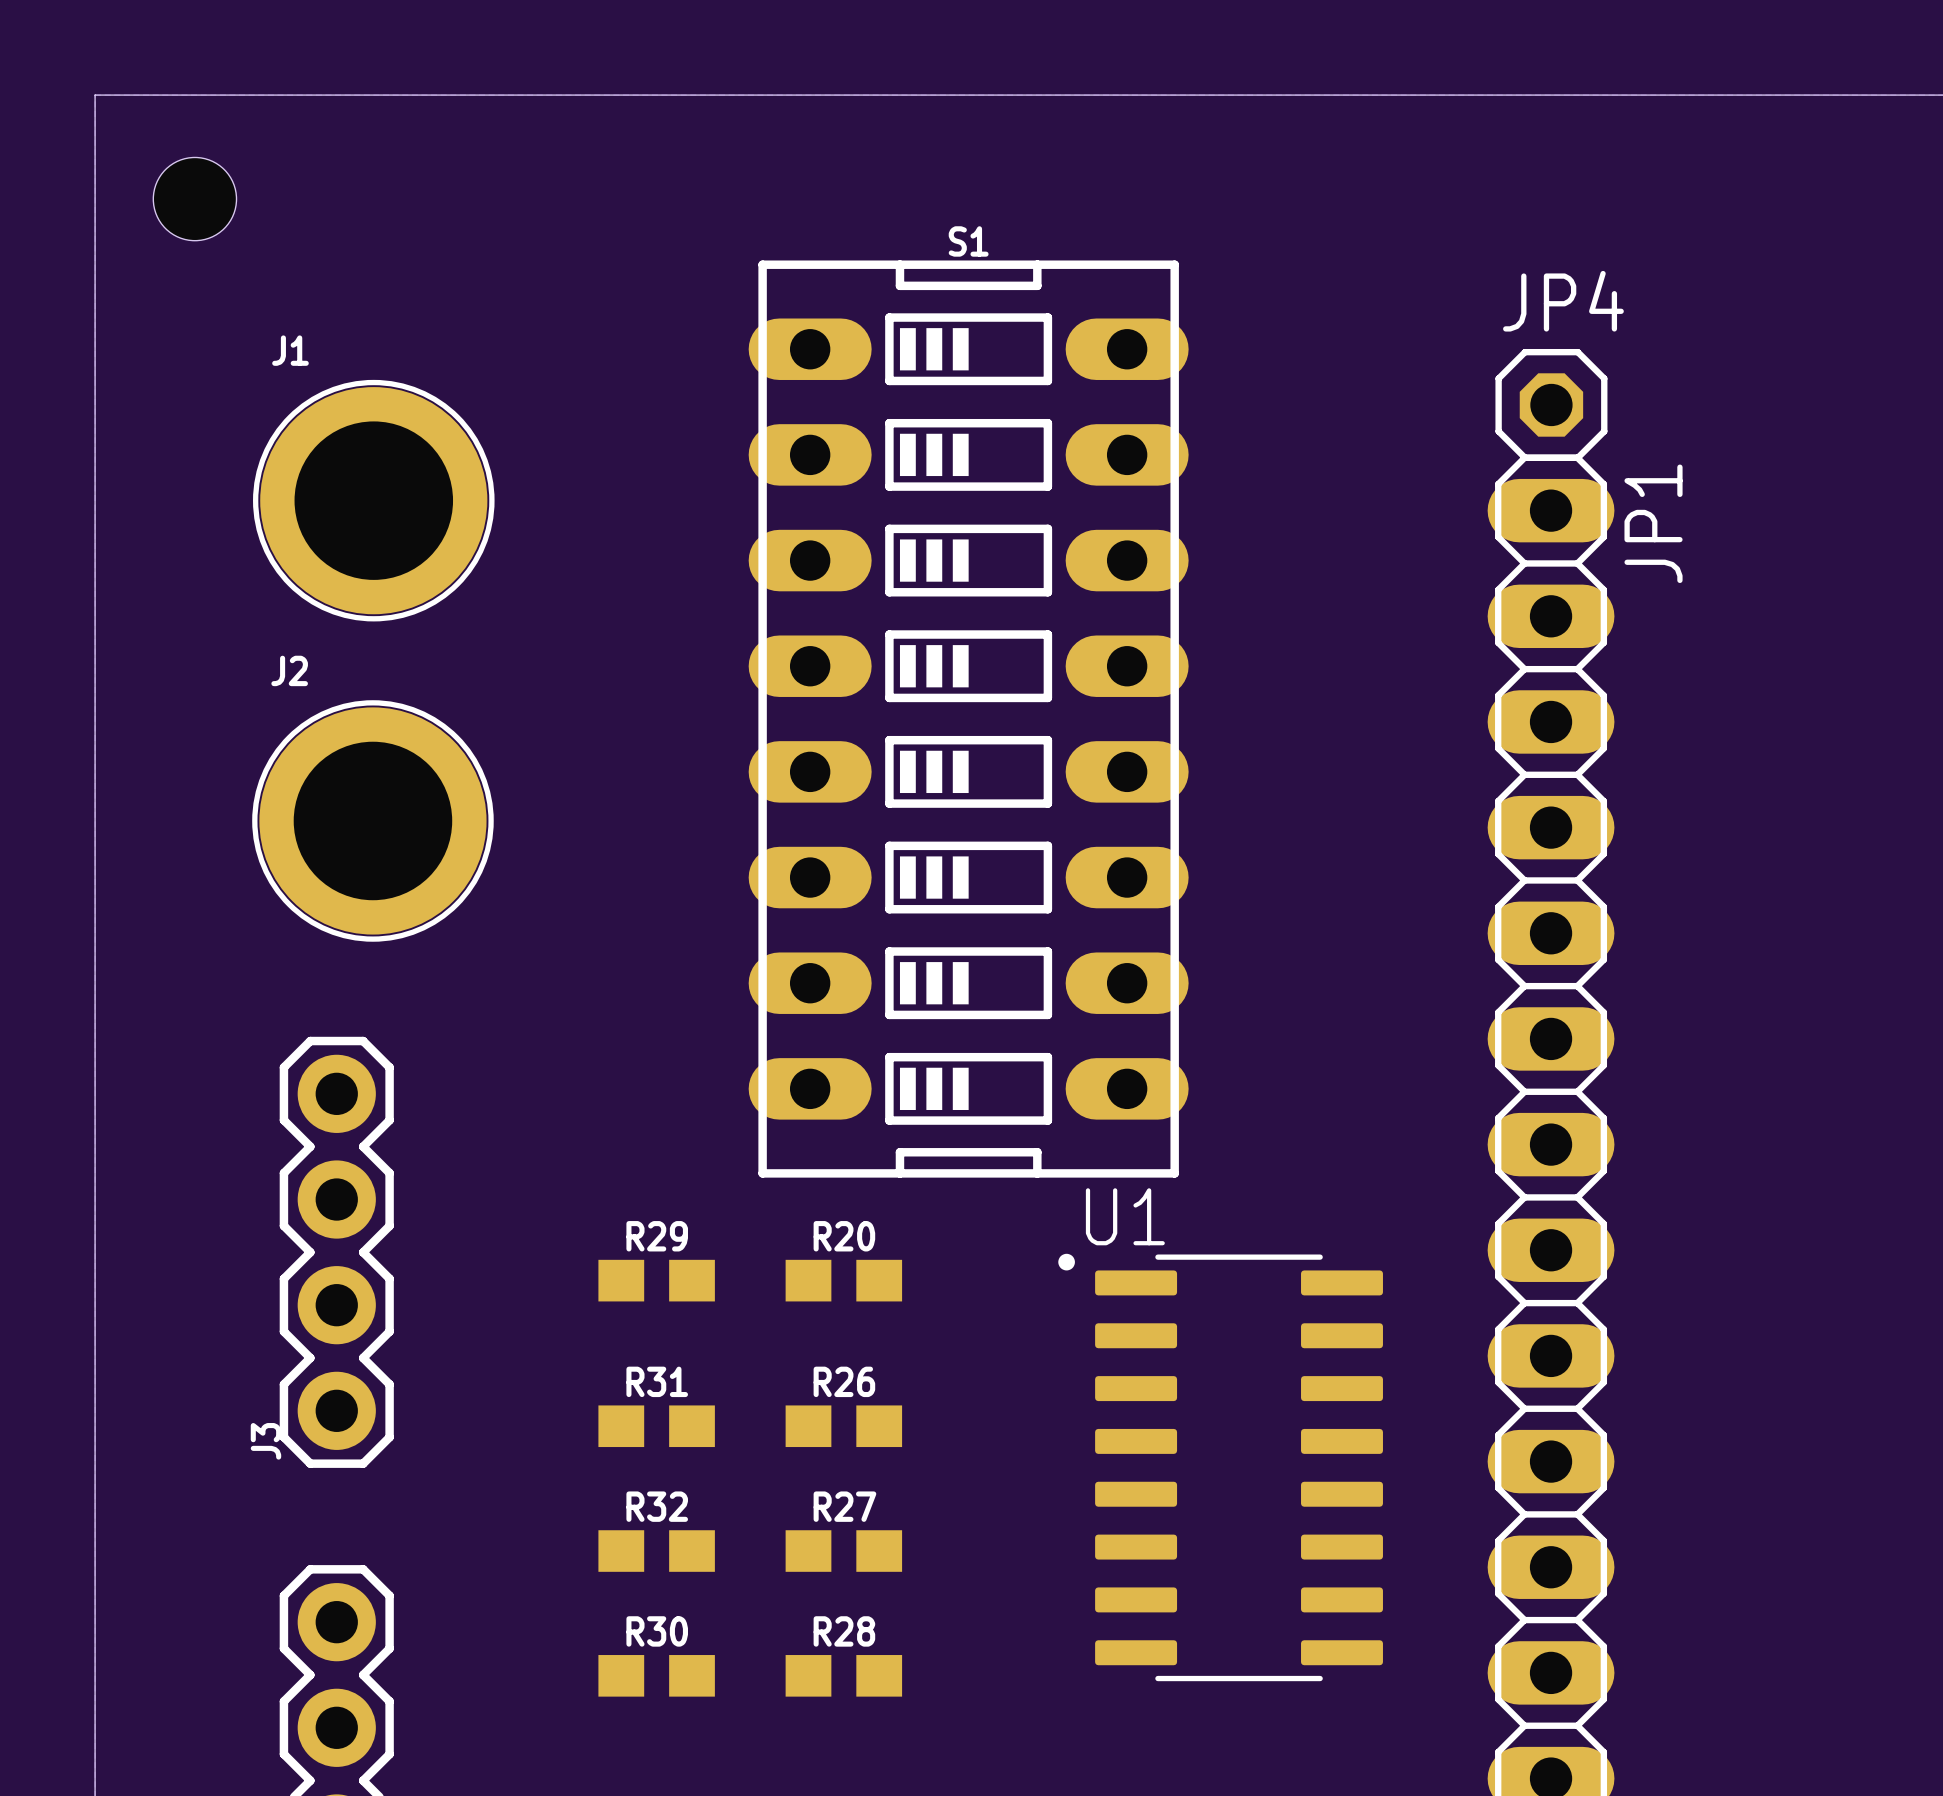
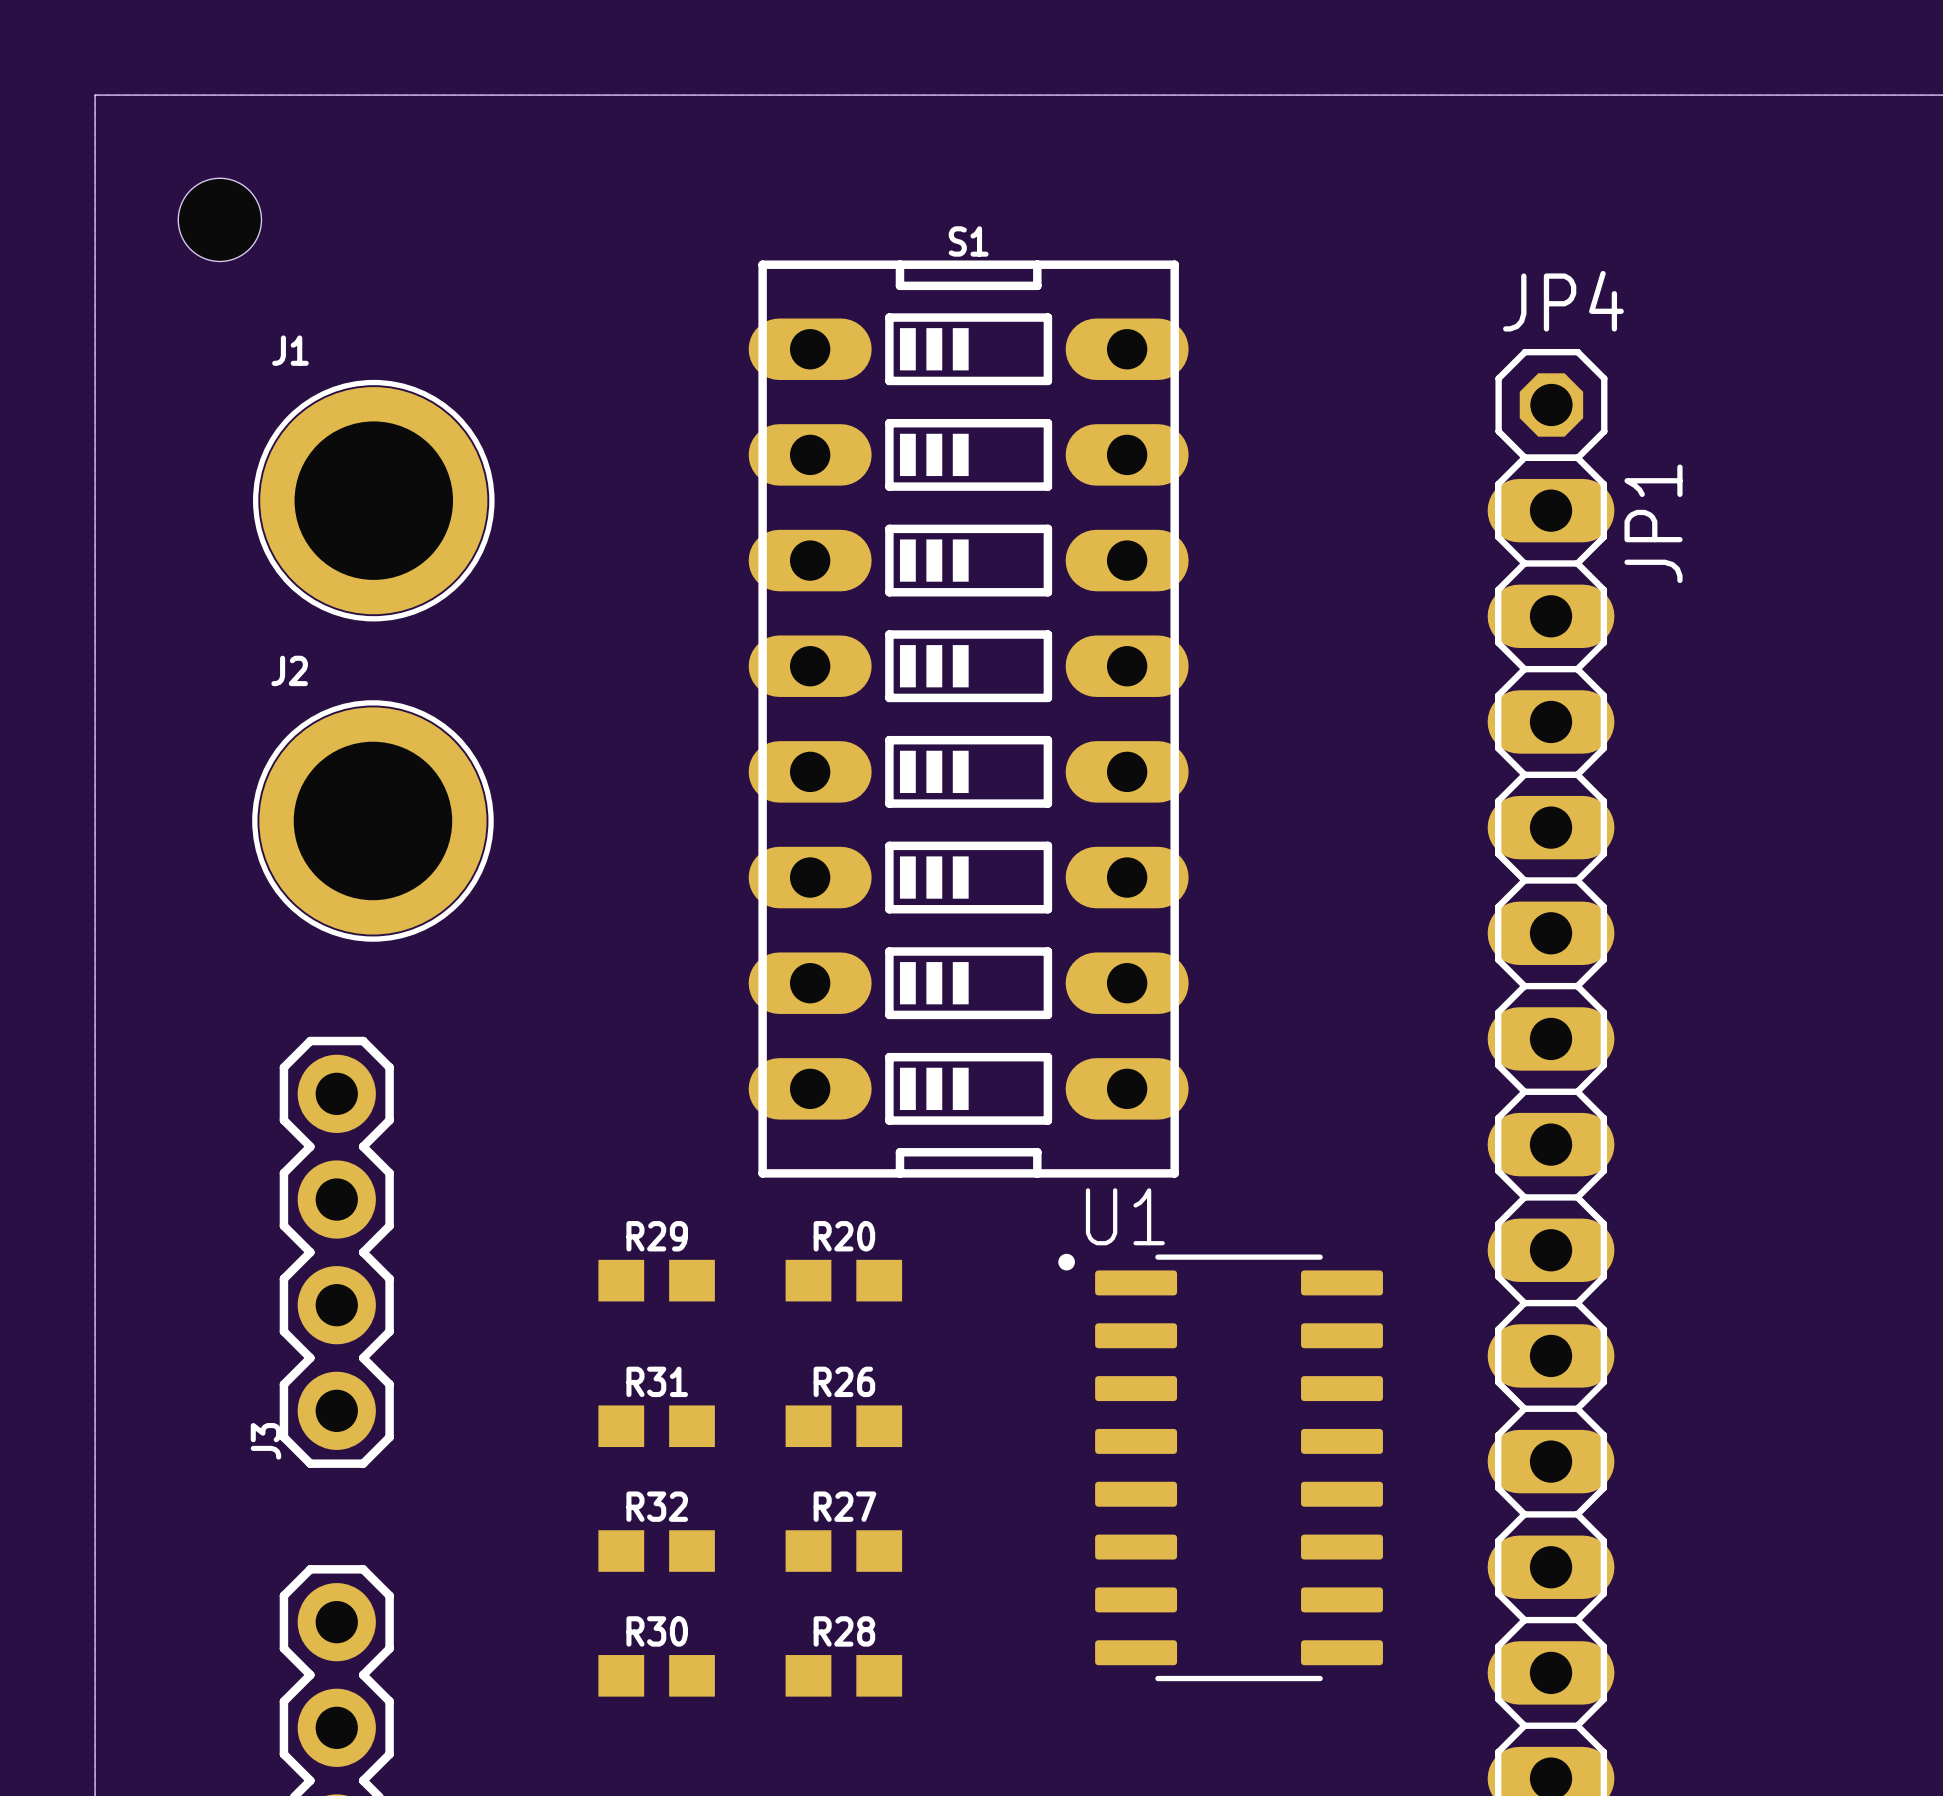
hole position: (194, 199) -> (219, 219)

